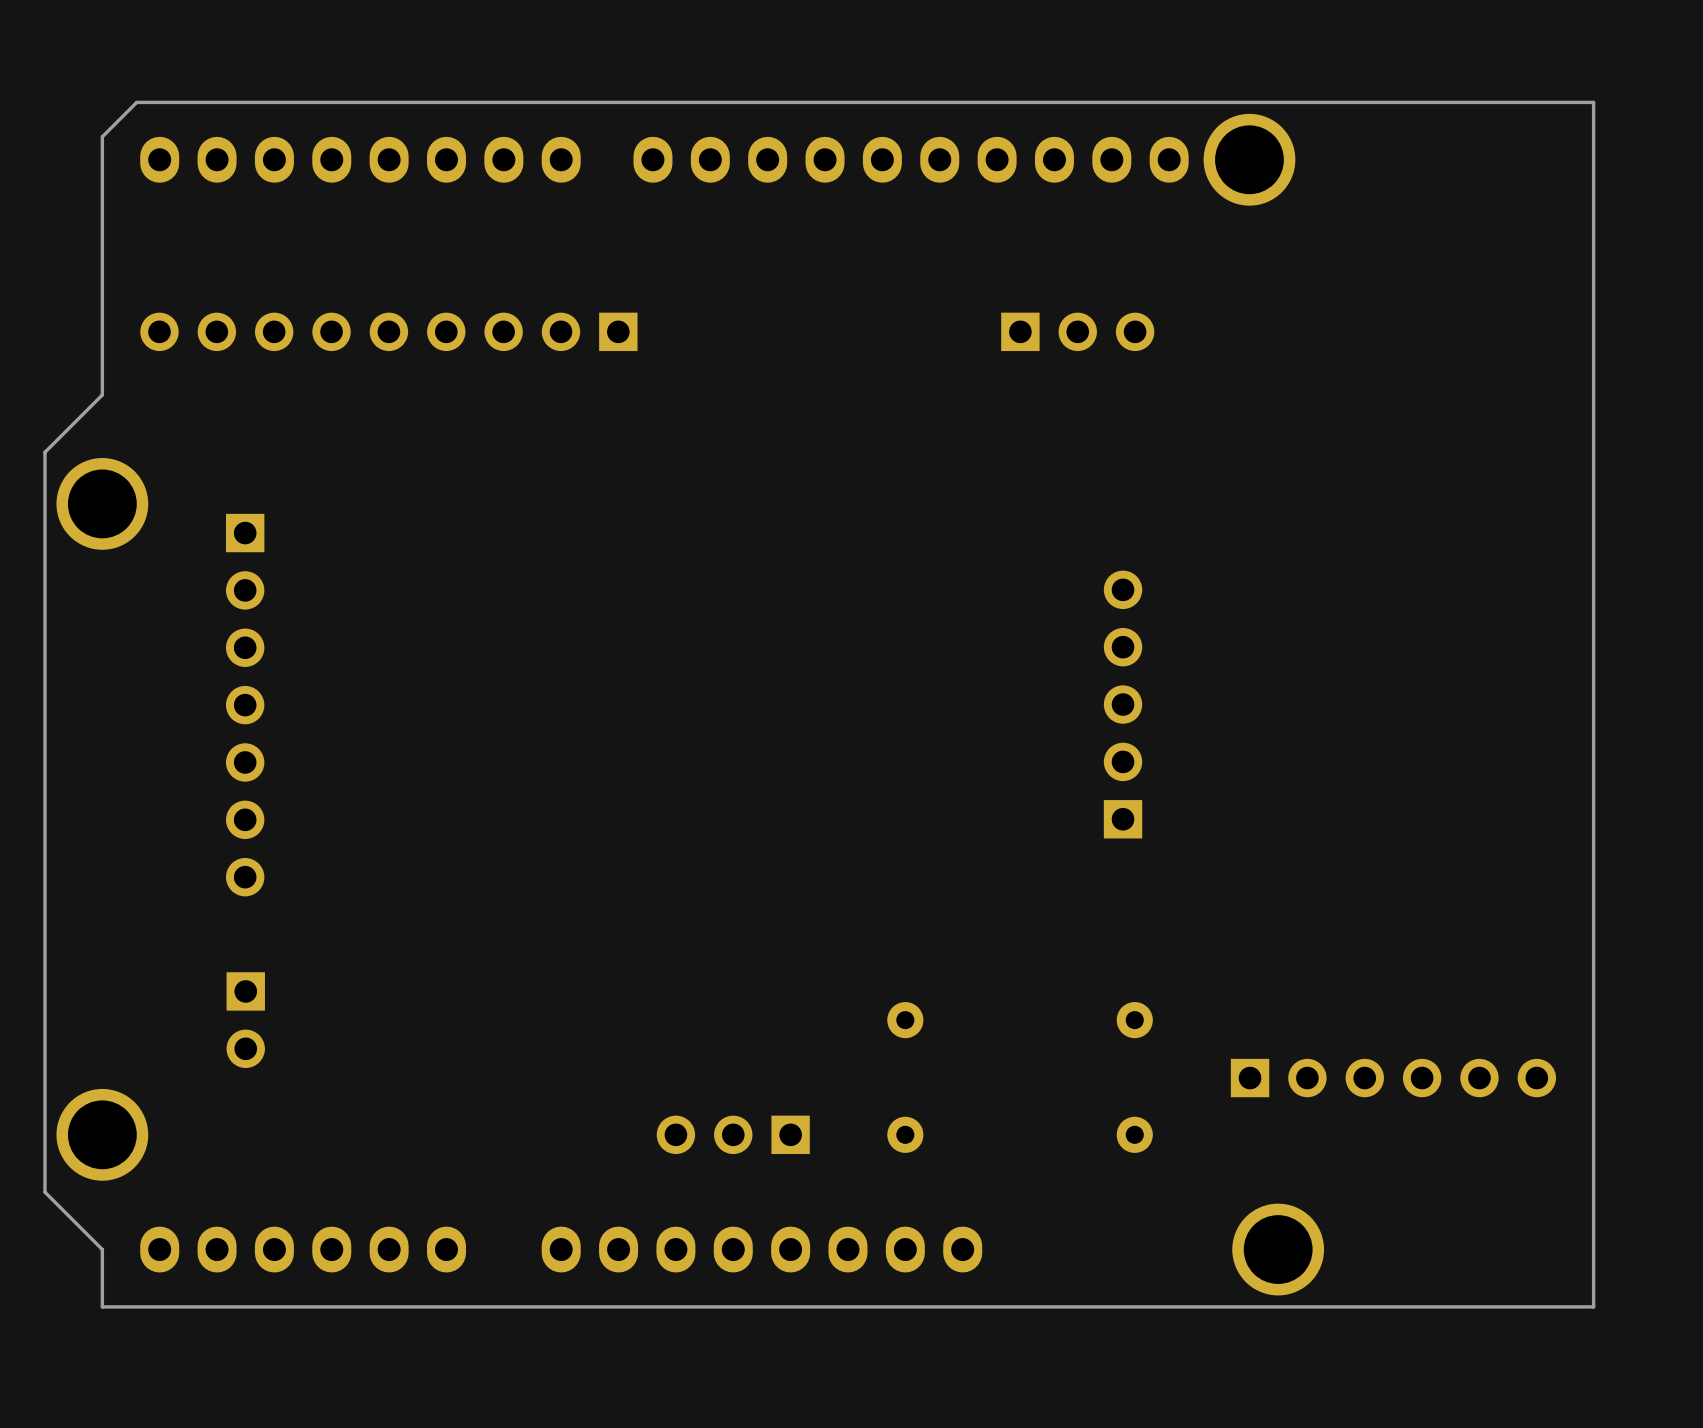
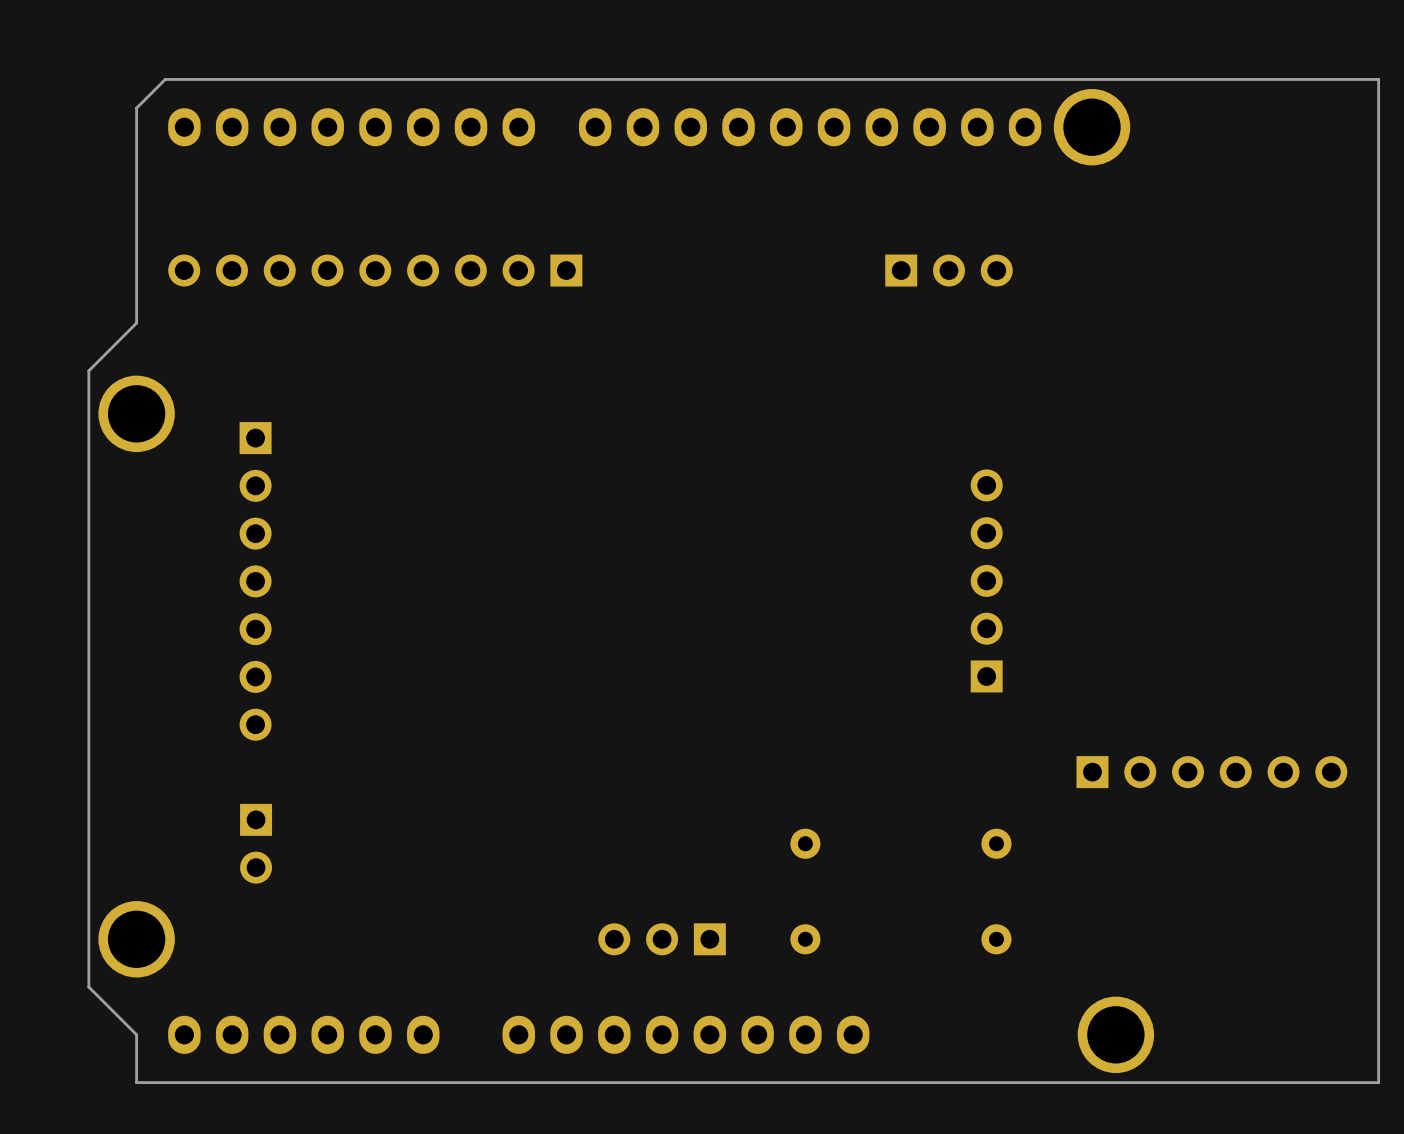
part position: (1393, 1078) -> (1211, 772)

